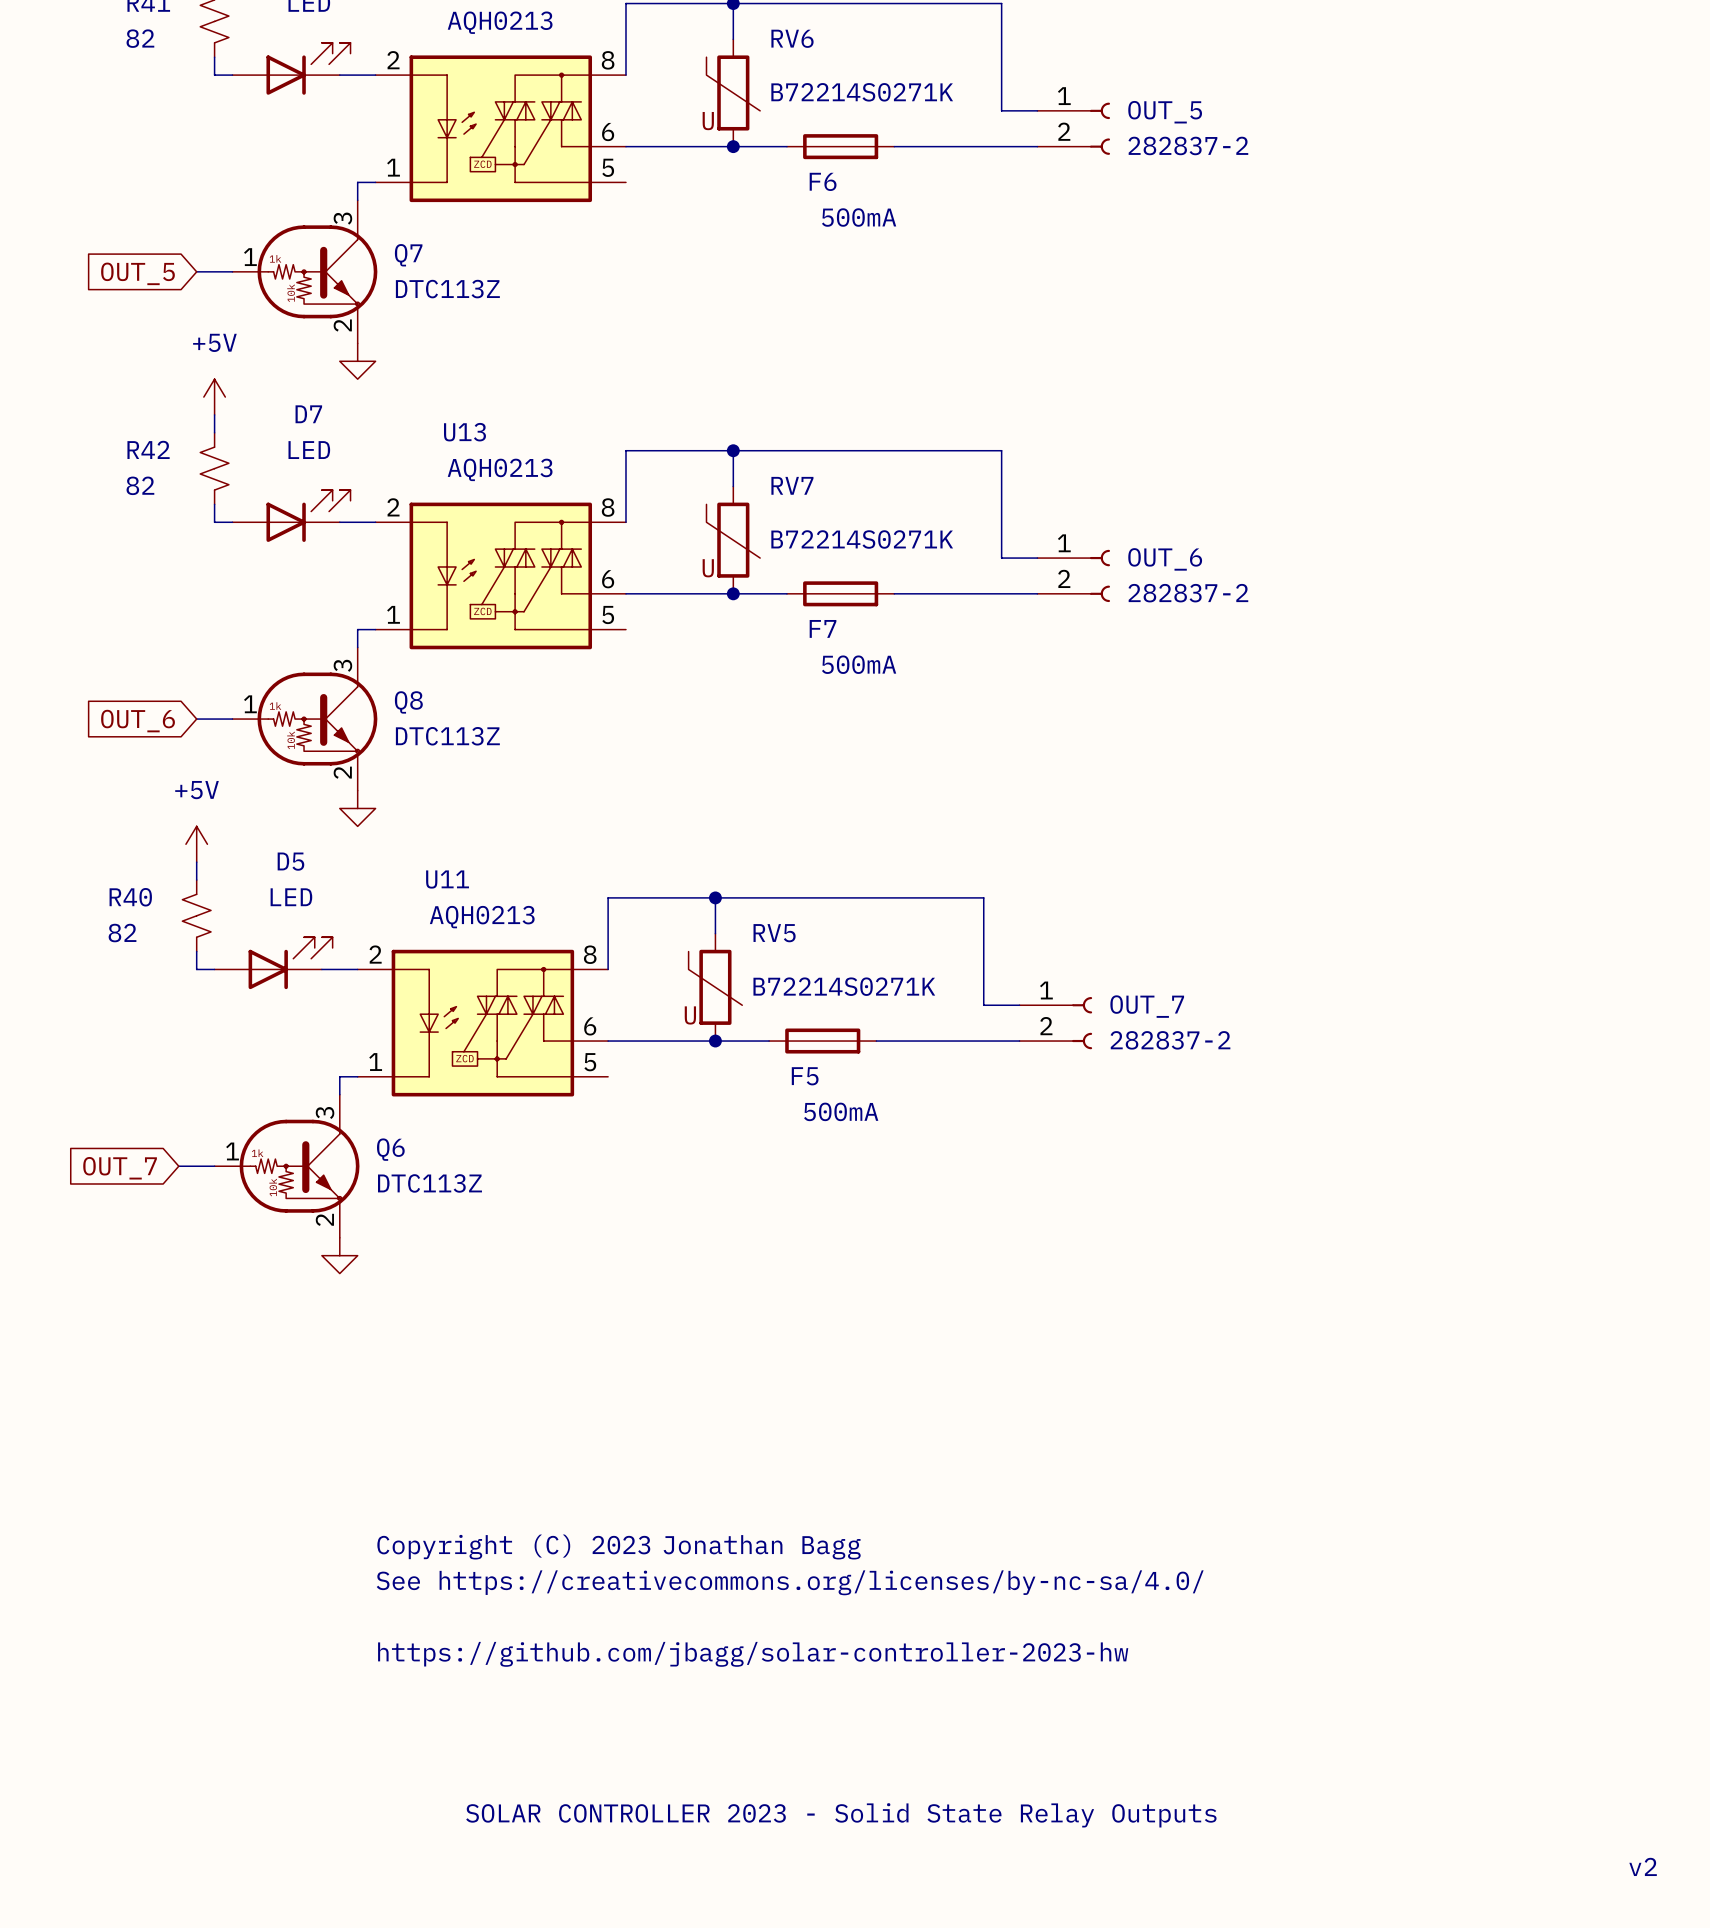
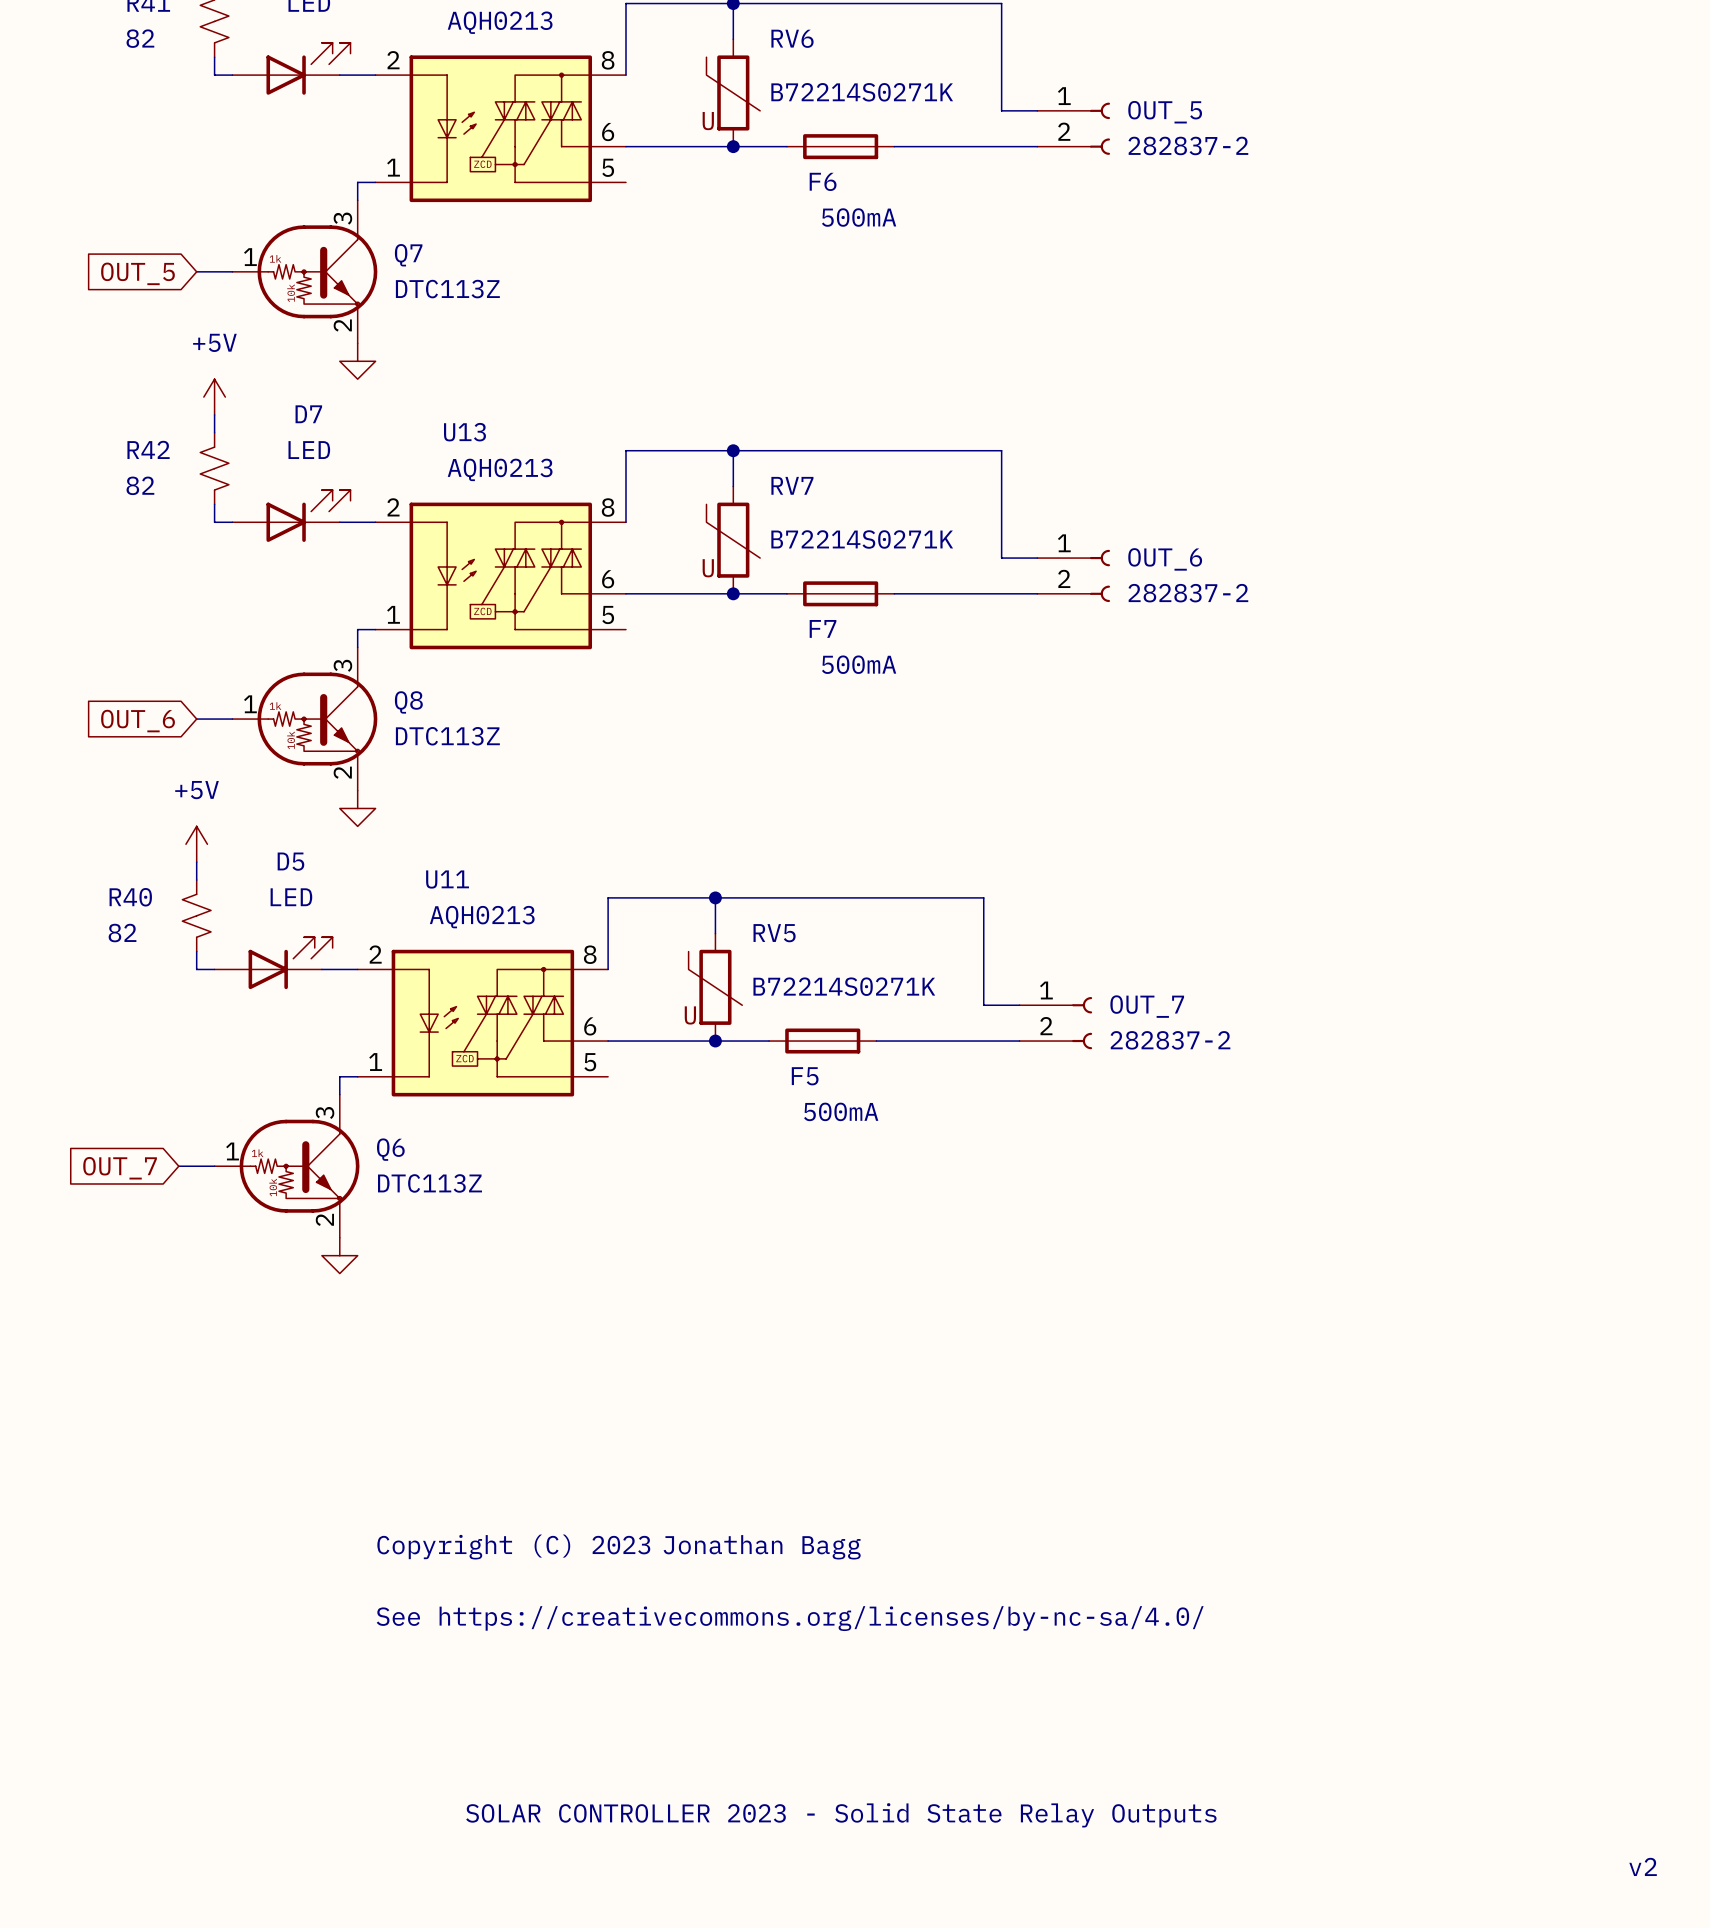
text position: See https://creativecommons.org/licenses/by-nc-sa/4.0/ (790, 1582) -> See https://creativecommons.org/licenses/by-nc-sa/4.0/ (790, 1618)
text: https://github.com/jbagg/solar-controller-2023-hw (753, 1654) -> none

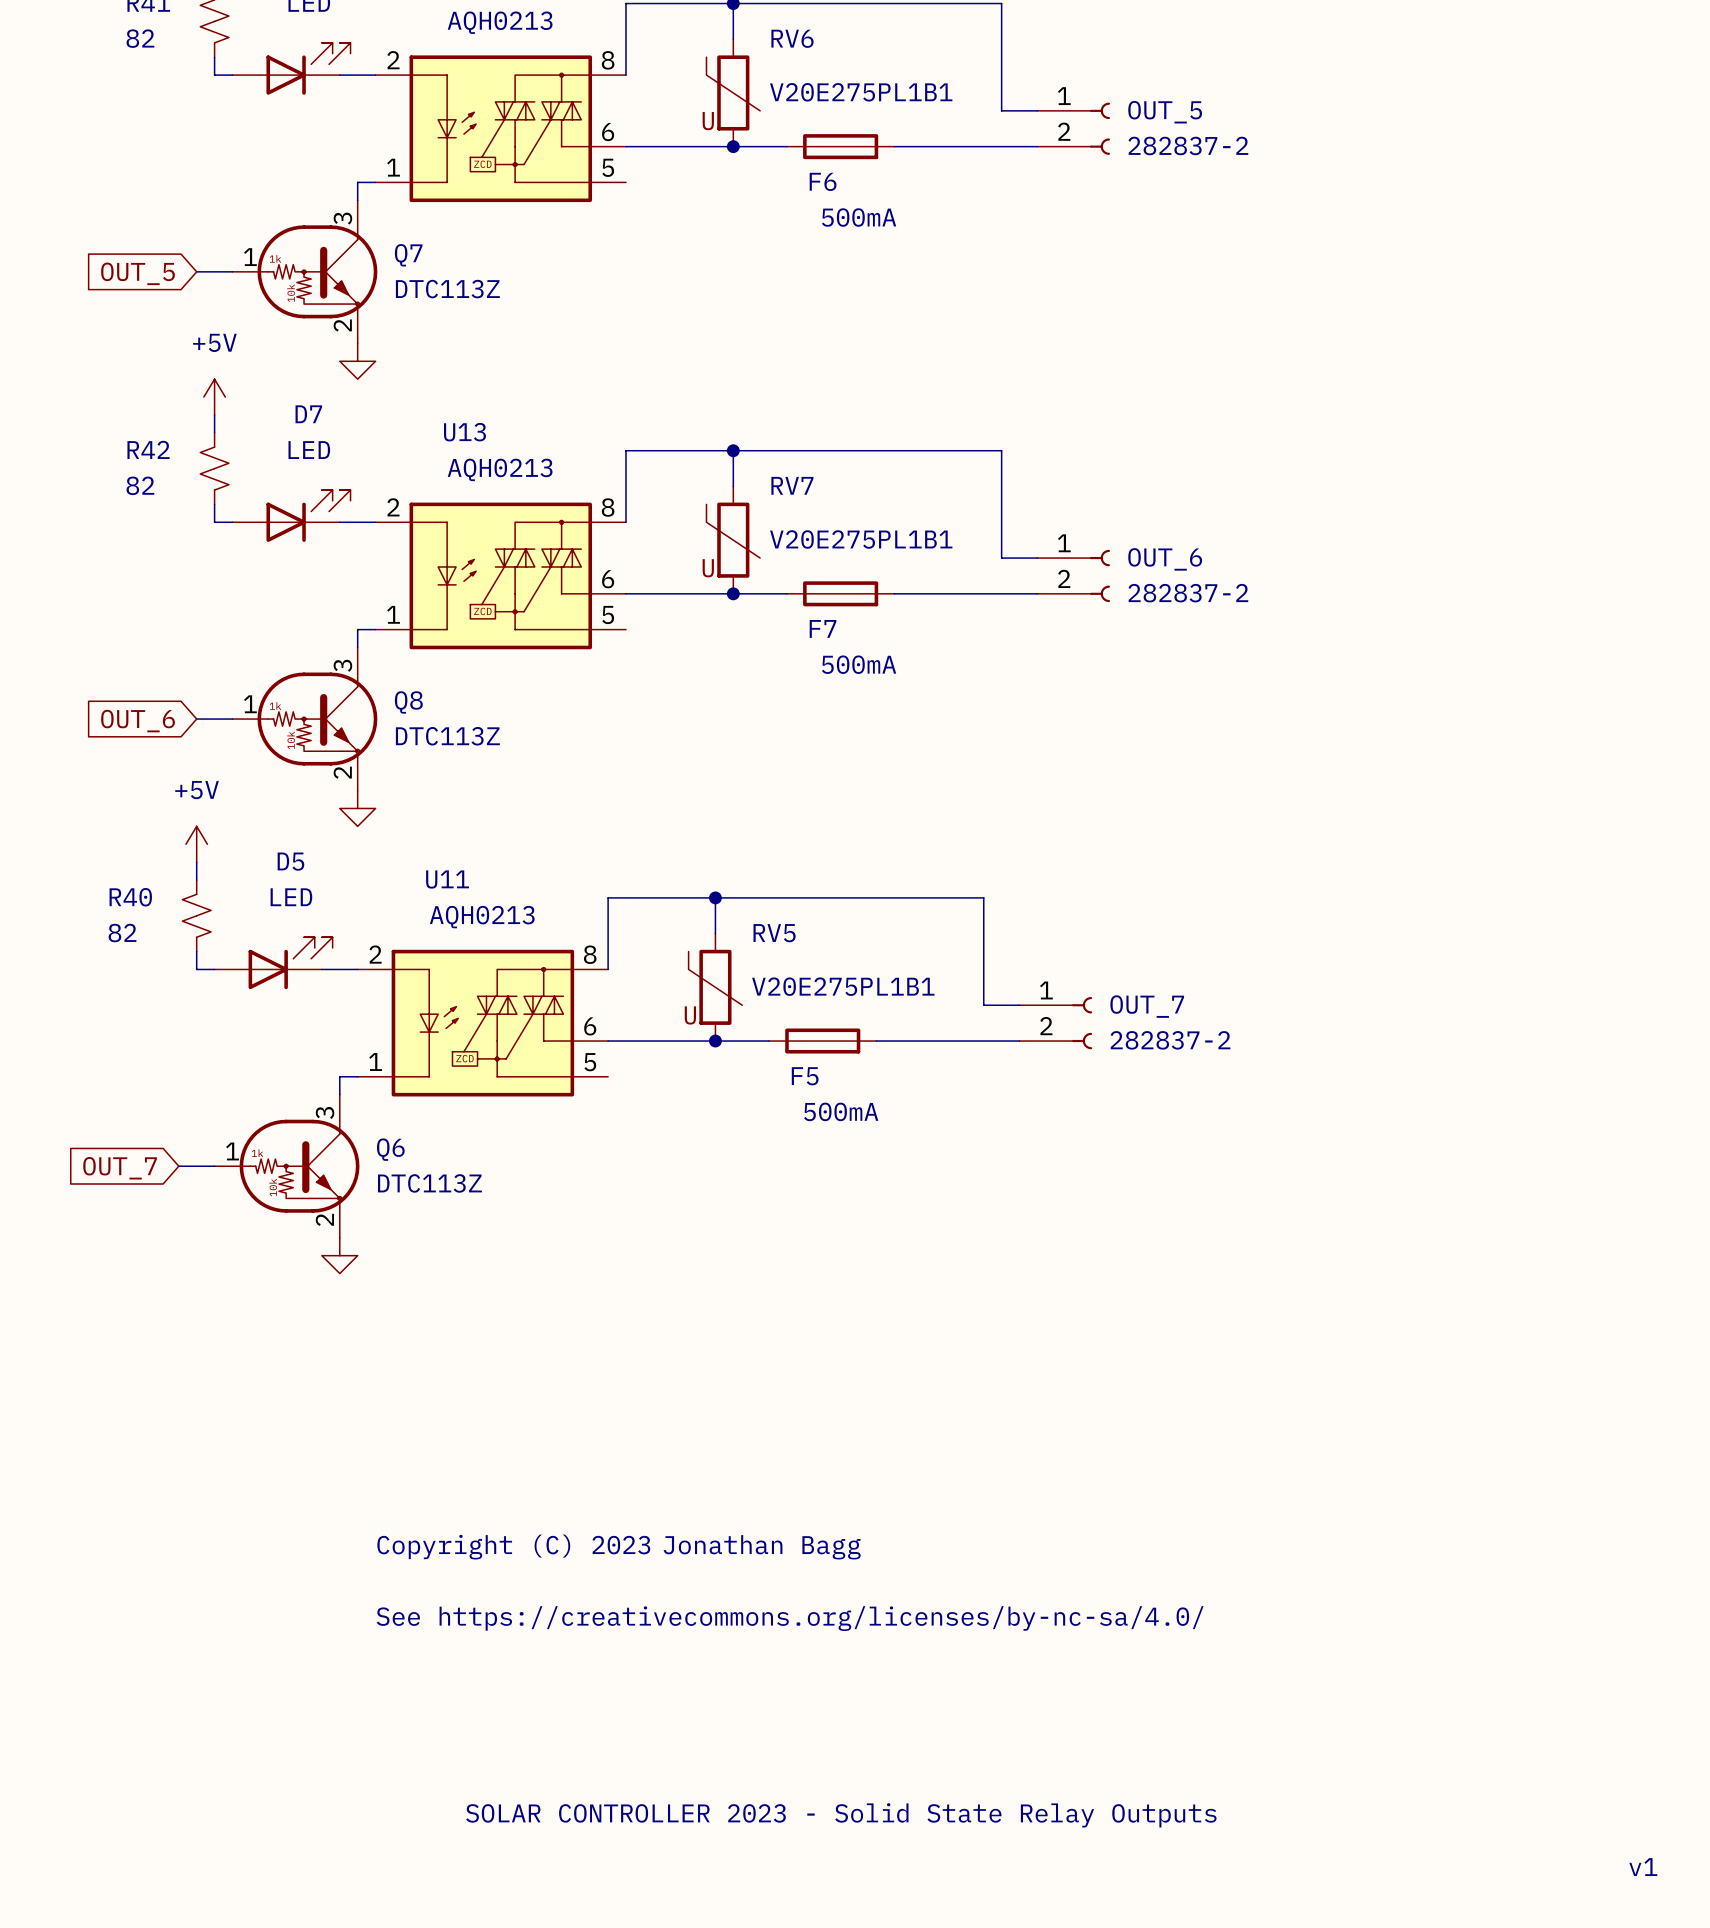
RV6 value: B72214S0271K (862, 92) -> V20E275PL1B1 (861, 92)
RV7 value: B72214S0271K (862, 539) -> V20E275PL1B1 (861, 539)
RV5 value: B72214S0271K (844, 986) -> V20E275PL1B1 (843, 986)
text: v2 (1643, 1866) -> v1 (1643, 1867)

